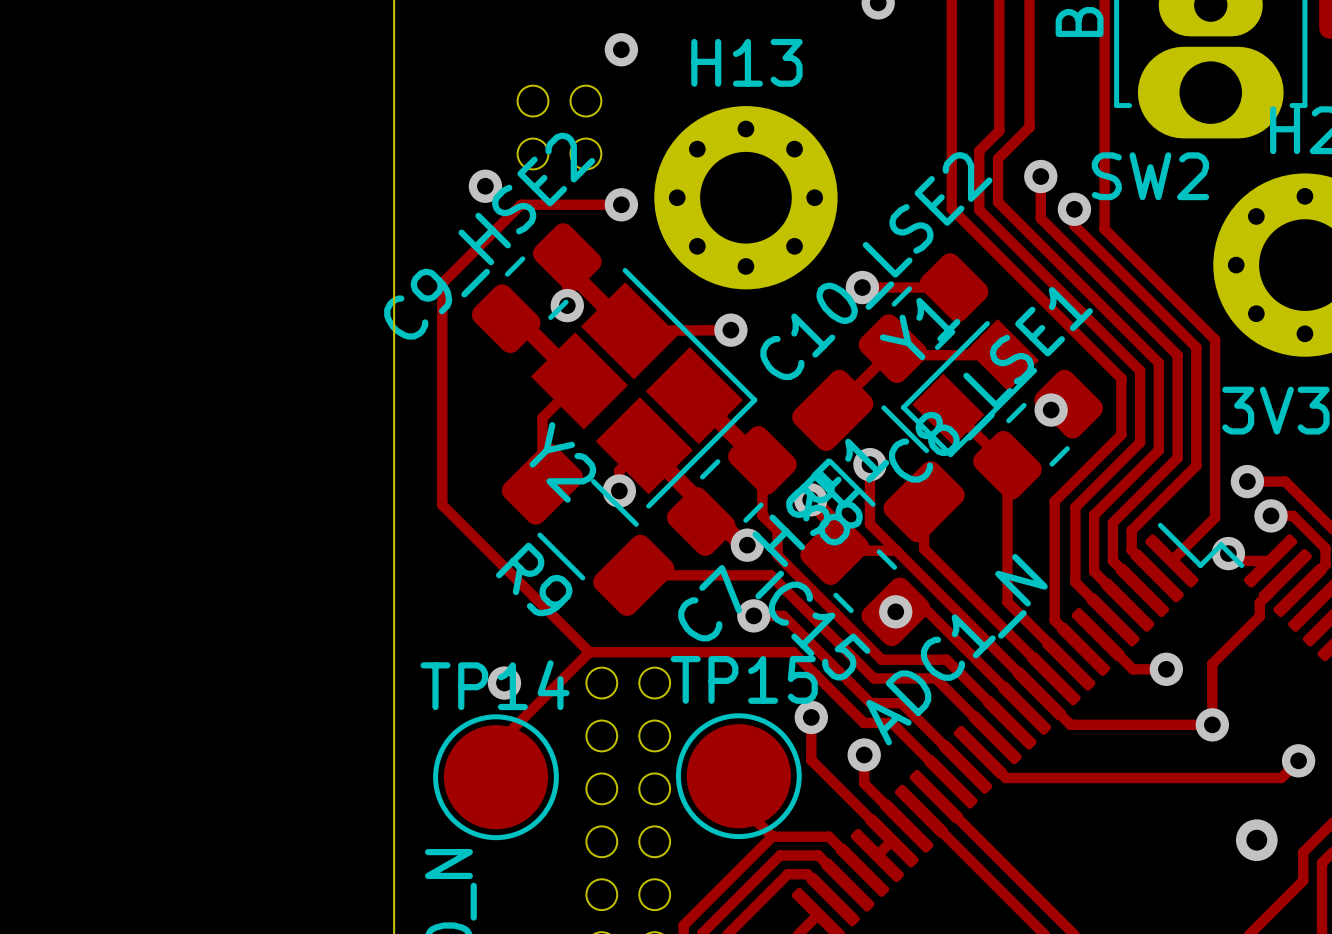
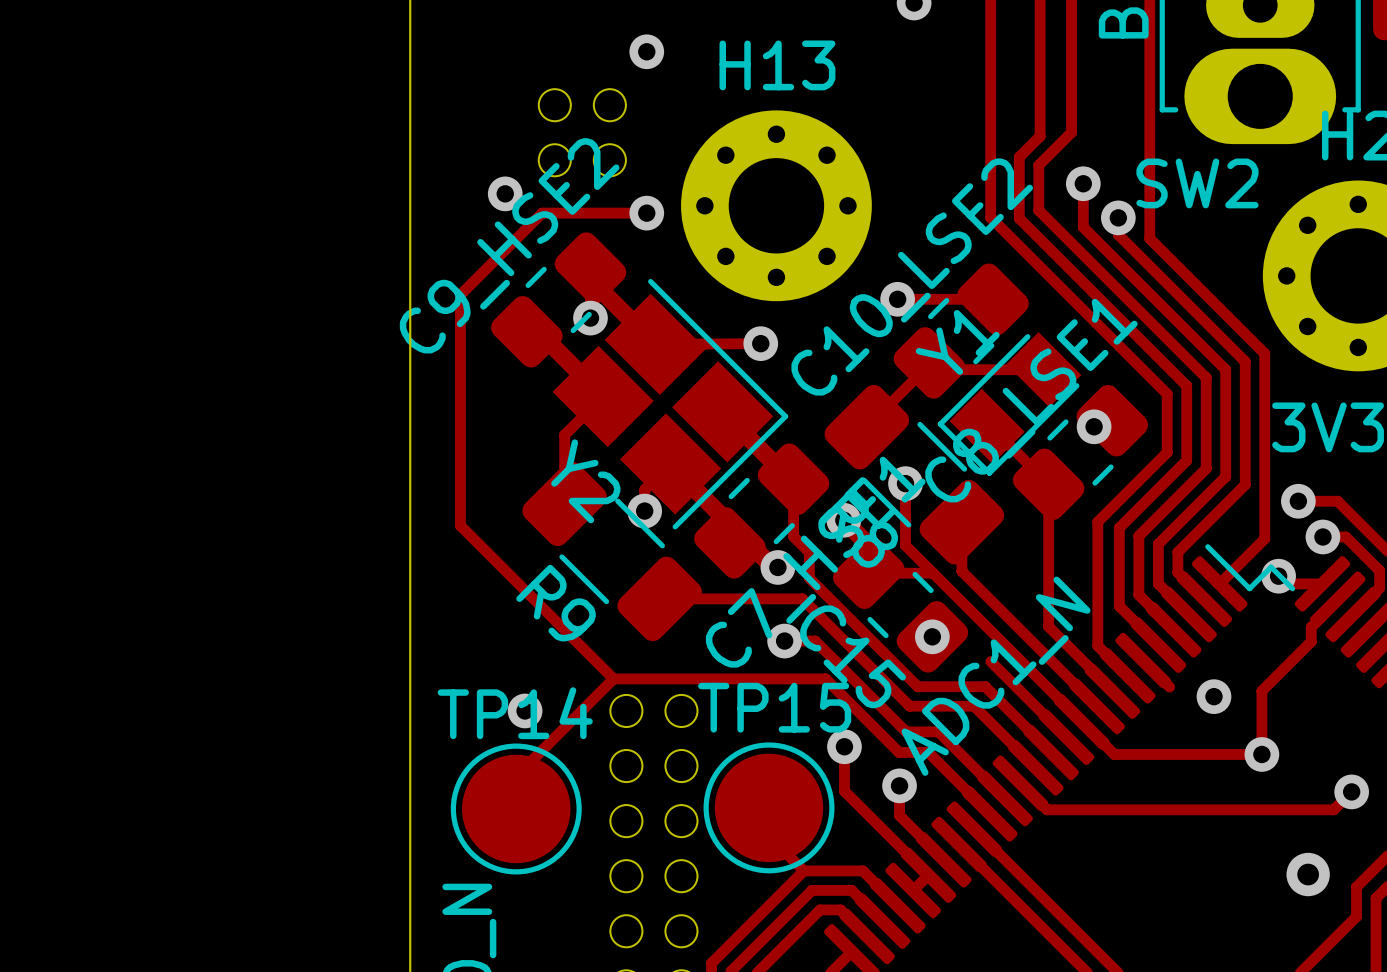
track: (895, 611) (928, 611) (951, 635) -> none
track: (1123, 660) (1132, 669) (1166, 669) -> none

